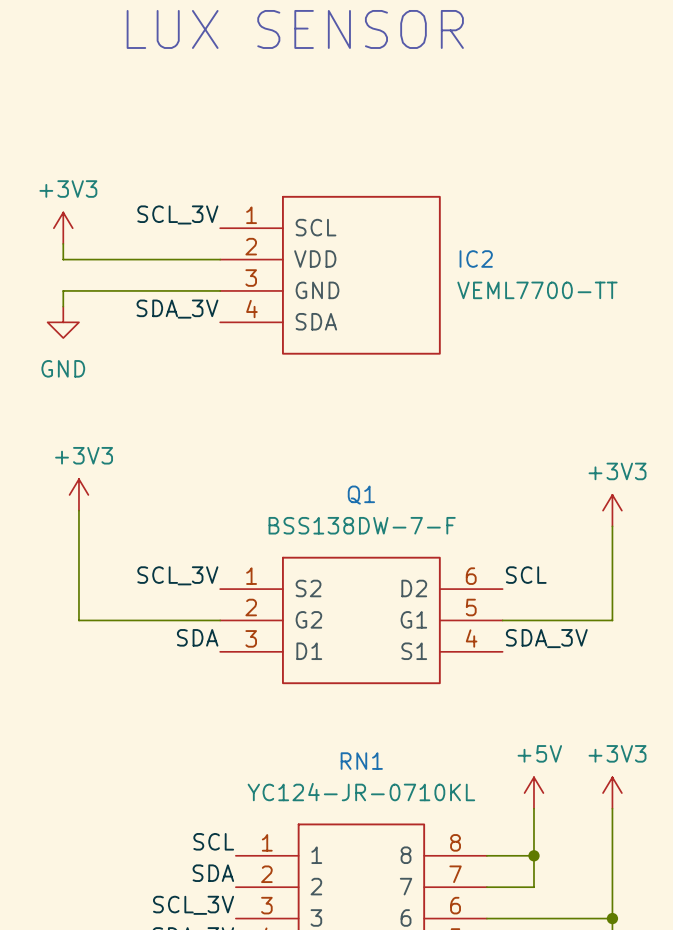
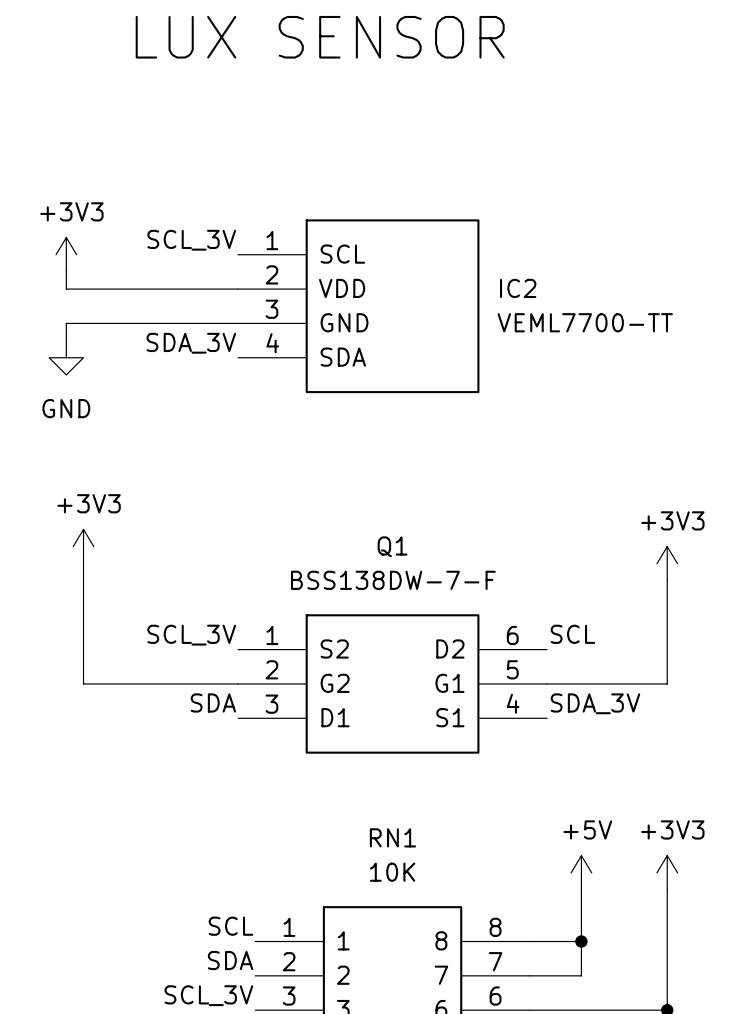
RN1 value: YC124-JR-0710KL (361, 792) -> 10K (392, 872)

